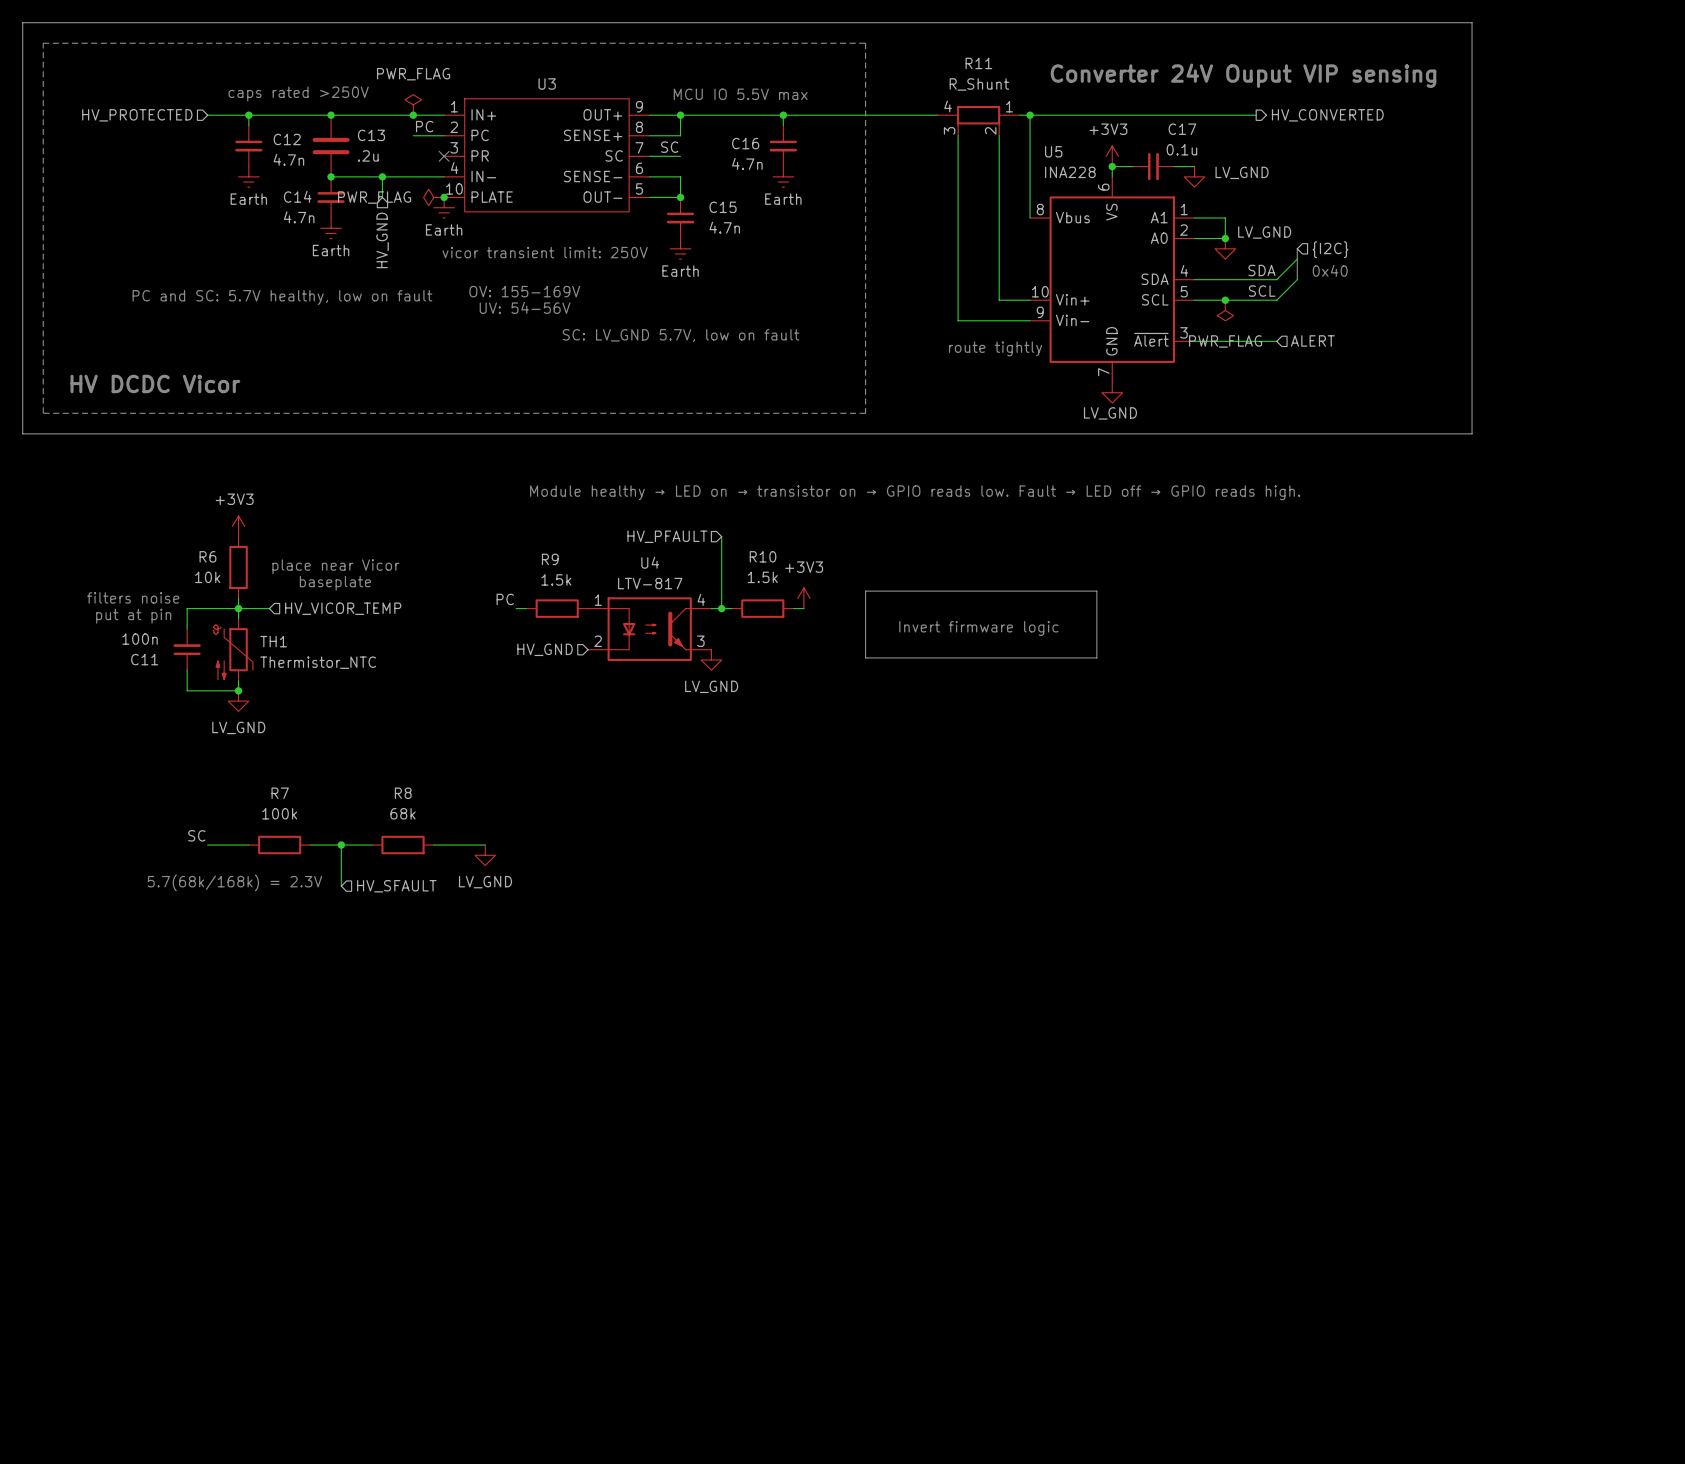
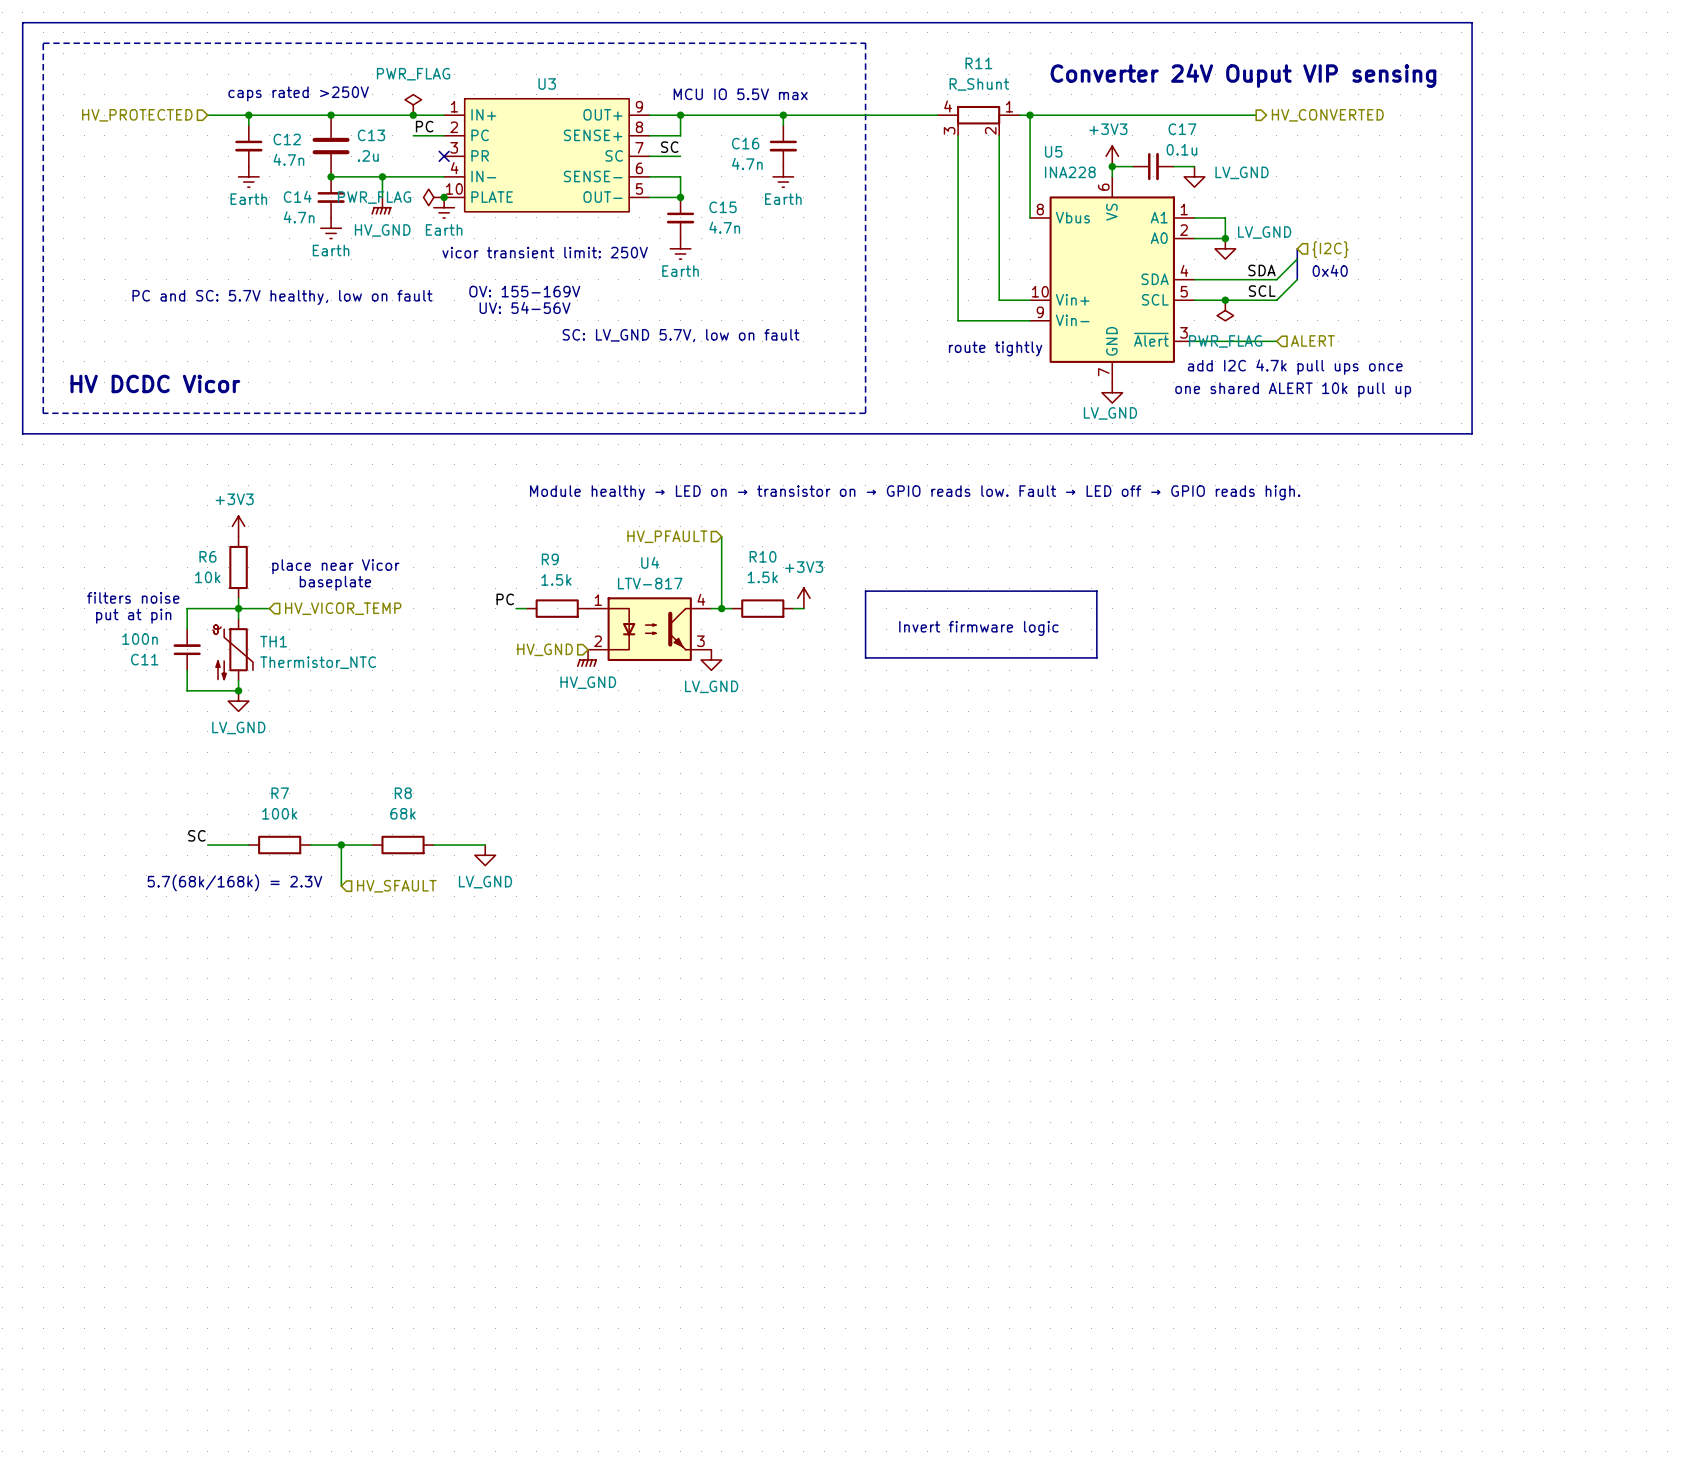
power symbol: none -> HV_GND (381, 206)
hierarchical label: HV_GND (382, 240) -> none
text: none -> add I2C 4.7k pull ups once (1295, 367)
text: none -> one shared ALERT 10k pull up (1293, 389)
power symbol: none -> HV_GND (587, 658)

